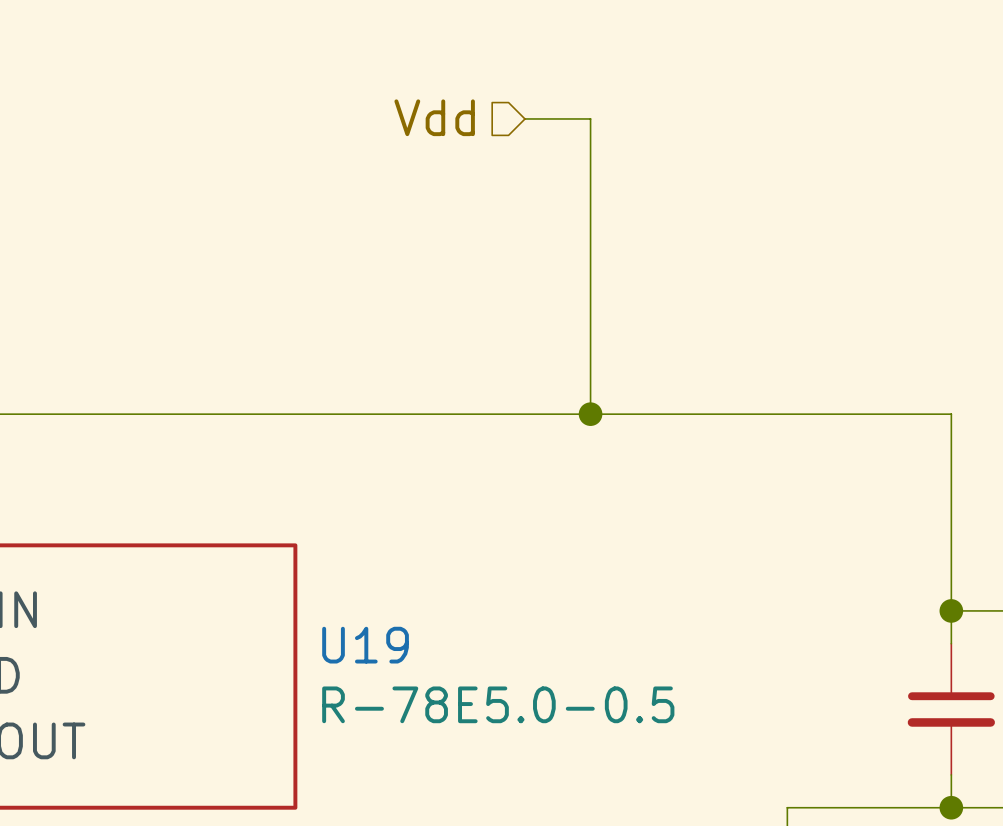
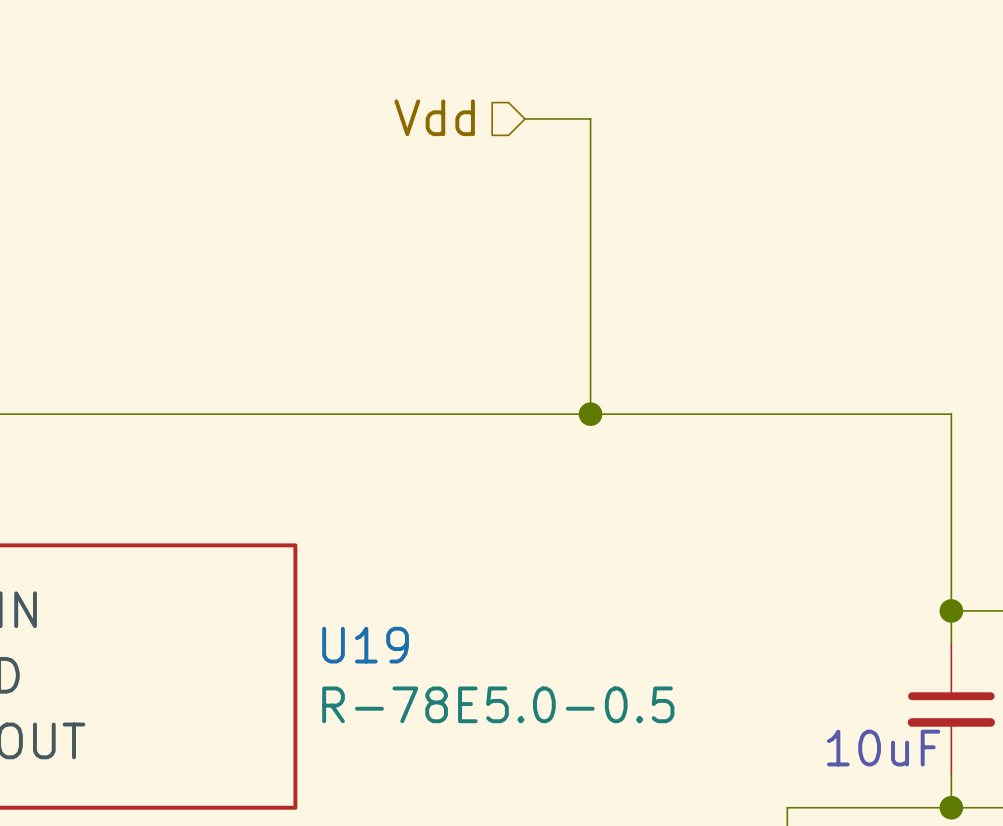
text: none -> 10uF (883, 748)

